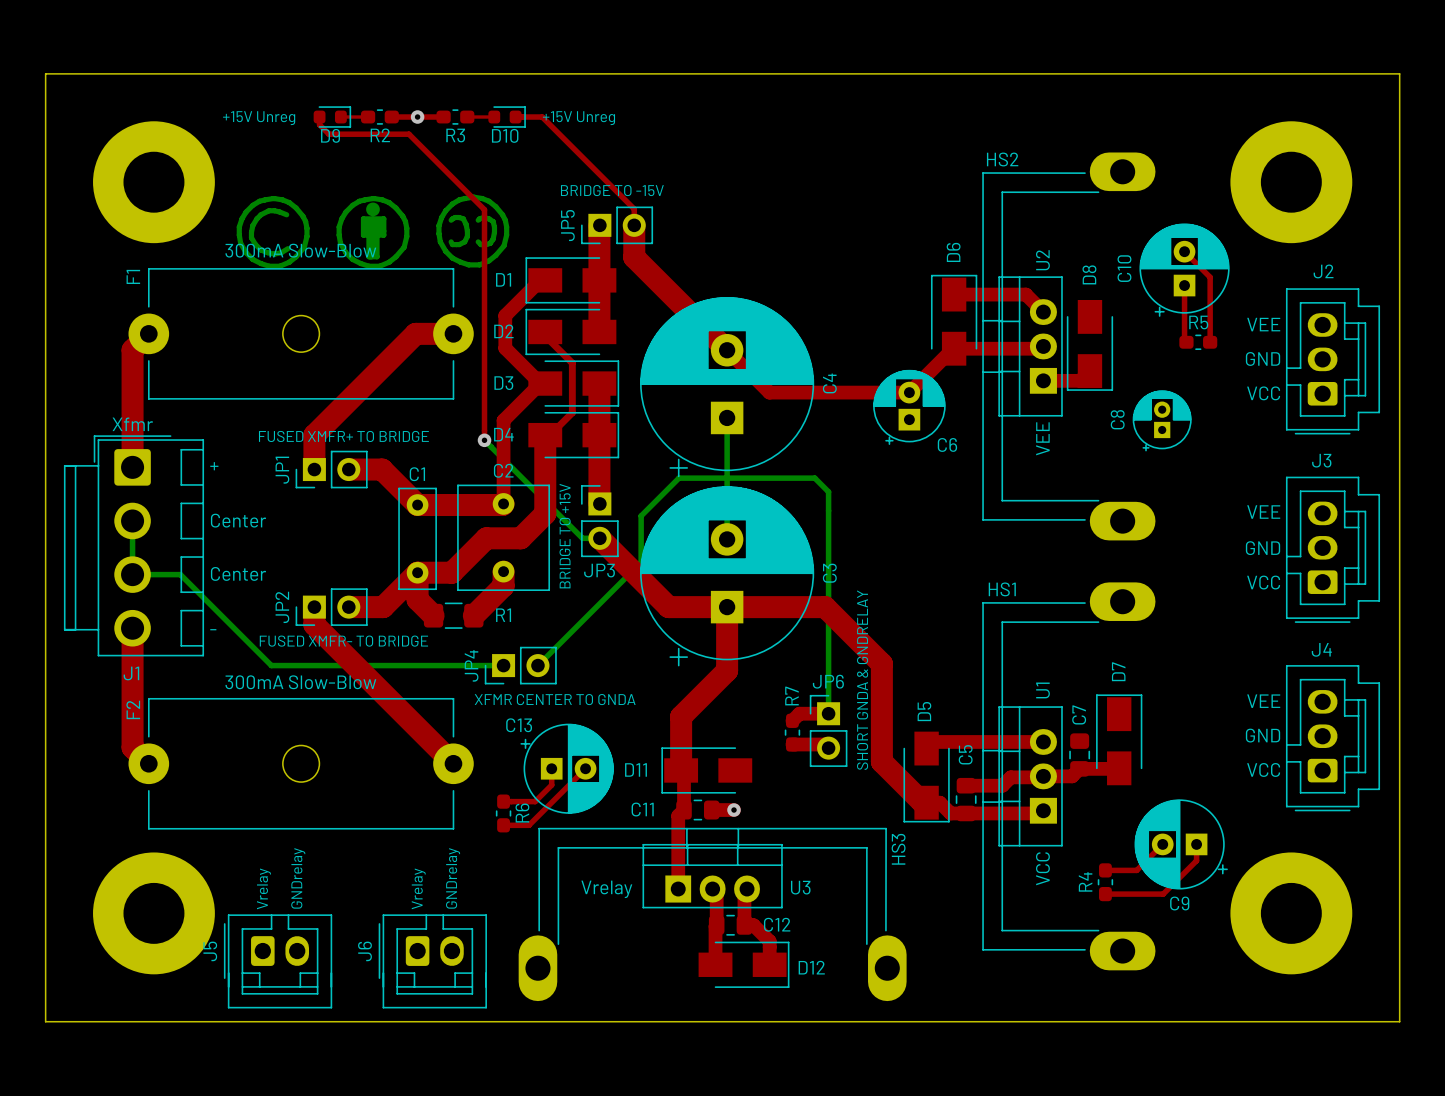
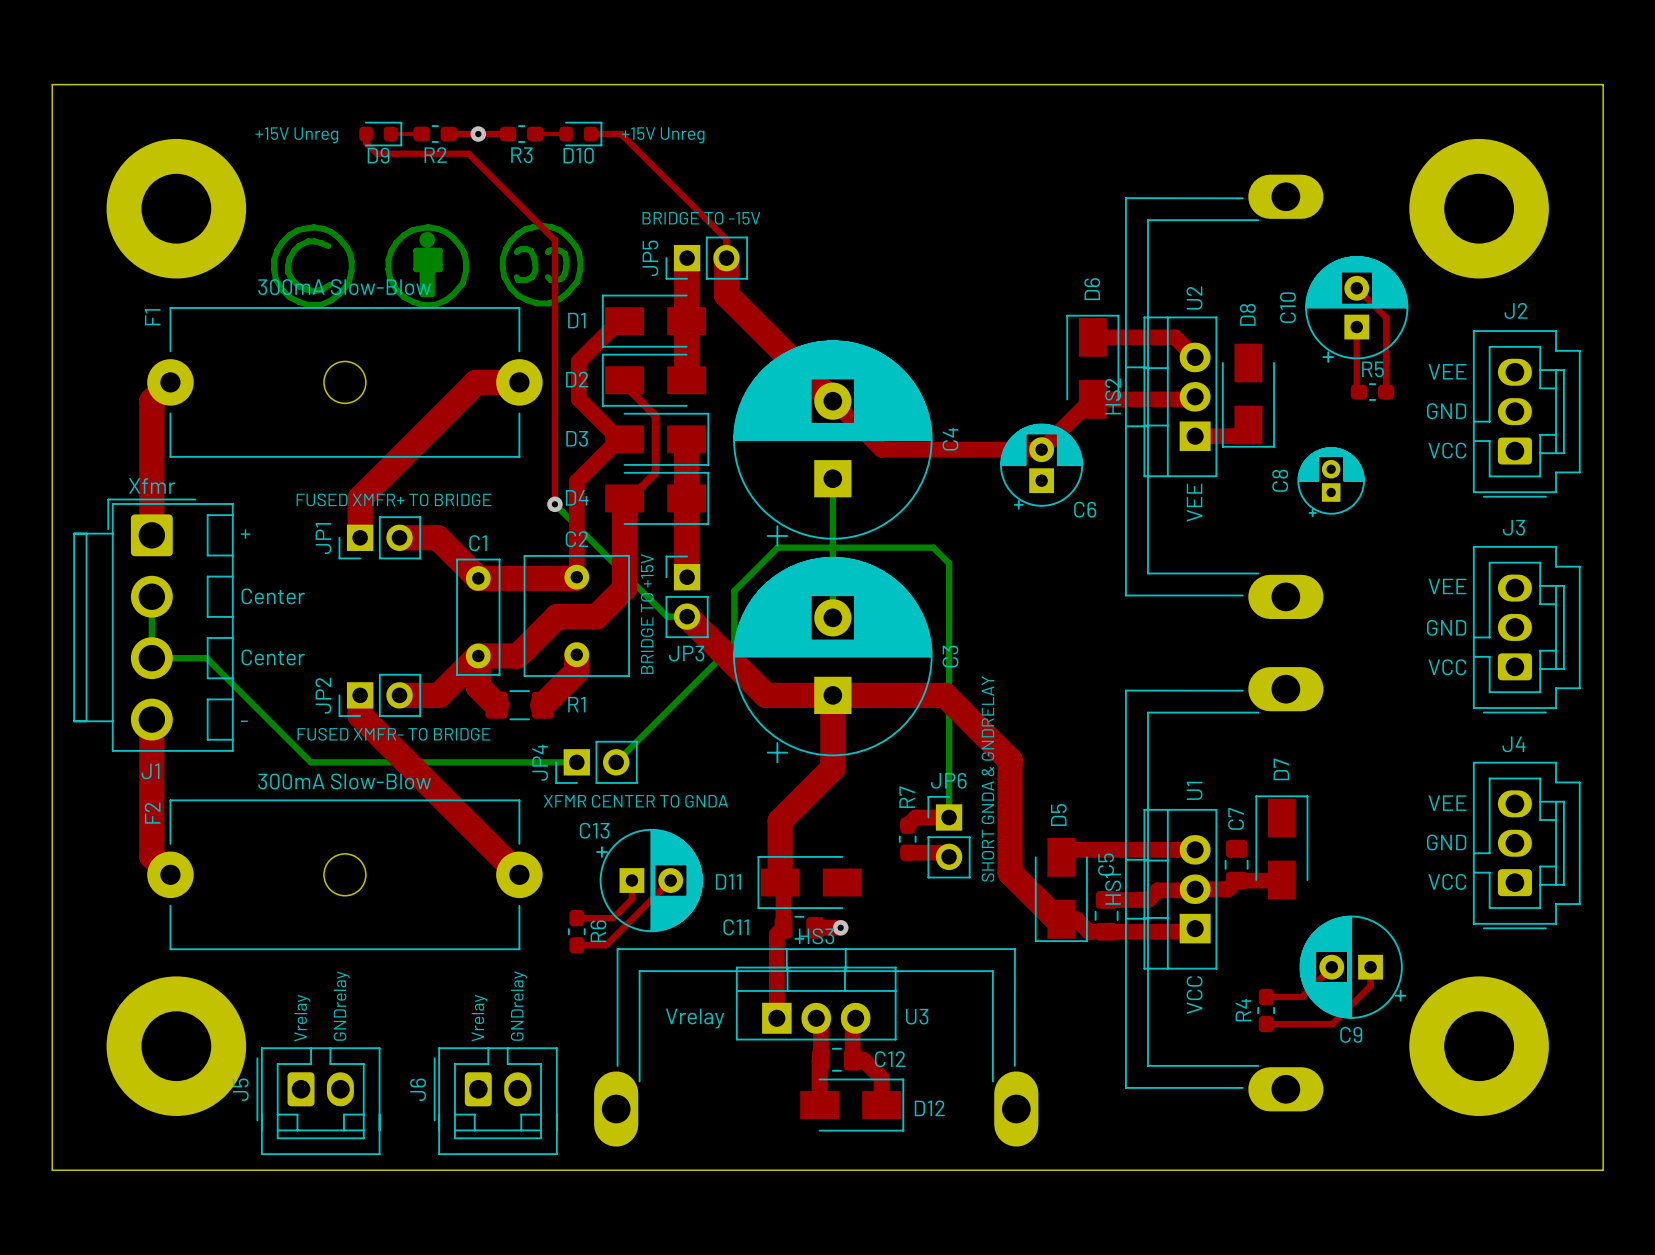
HS2 name rotation: 0° (1002, 159) -> 90° counterclockwise (1113, 396)
HS2 name position: HS2 (1002, 159) -> HS2 (1113, 396)
HS1 name rotation: 0° (1002, 589) -> 90° counterclockwise (1113, 889)
HS1 name position: HS1 (1002, 589) -> HS1 (1113, 889)
HS3 name rotation: 0° (898, 849) -> 90° clockwise (816, 936)
HS3 name position: HS3 (898, 849) -> HS3 (816, 936)

